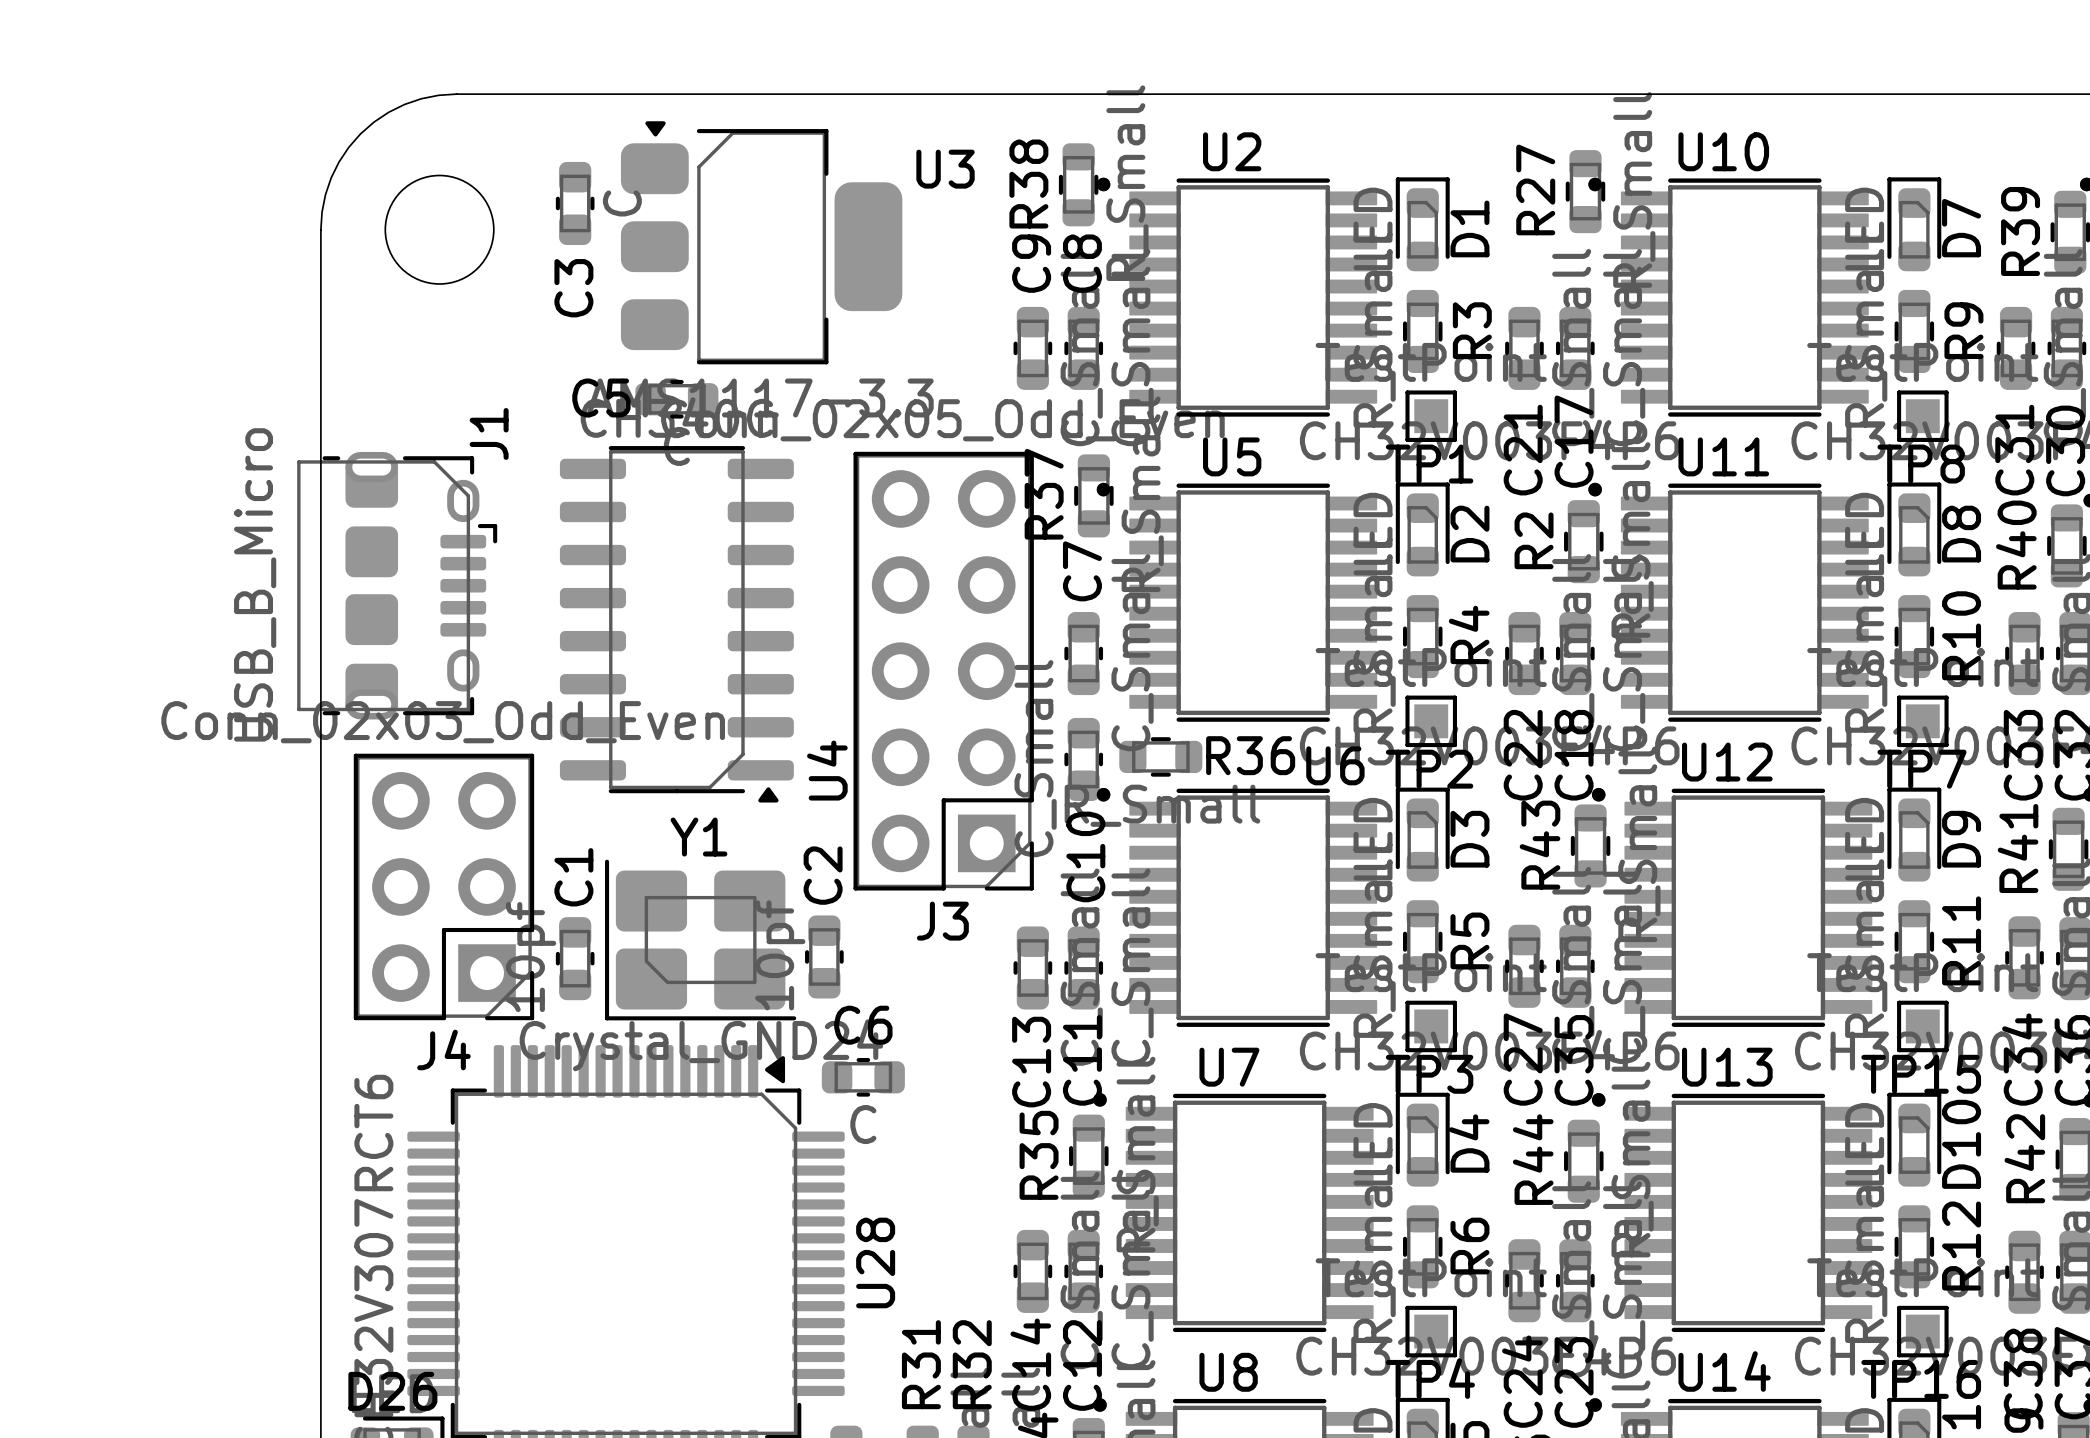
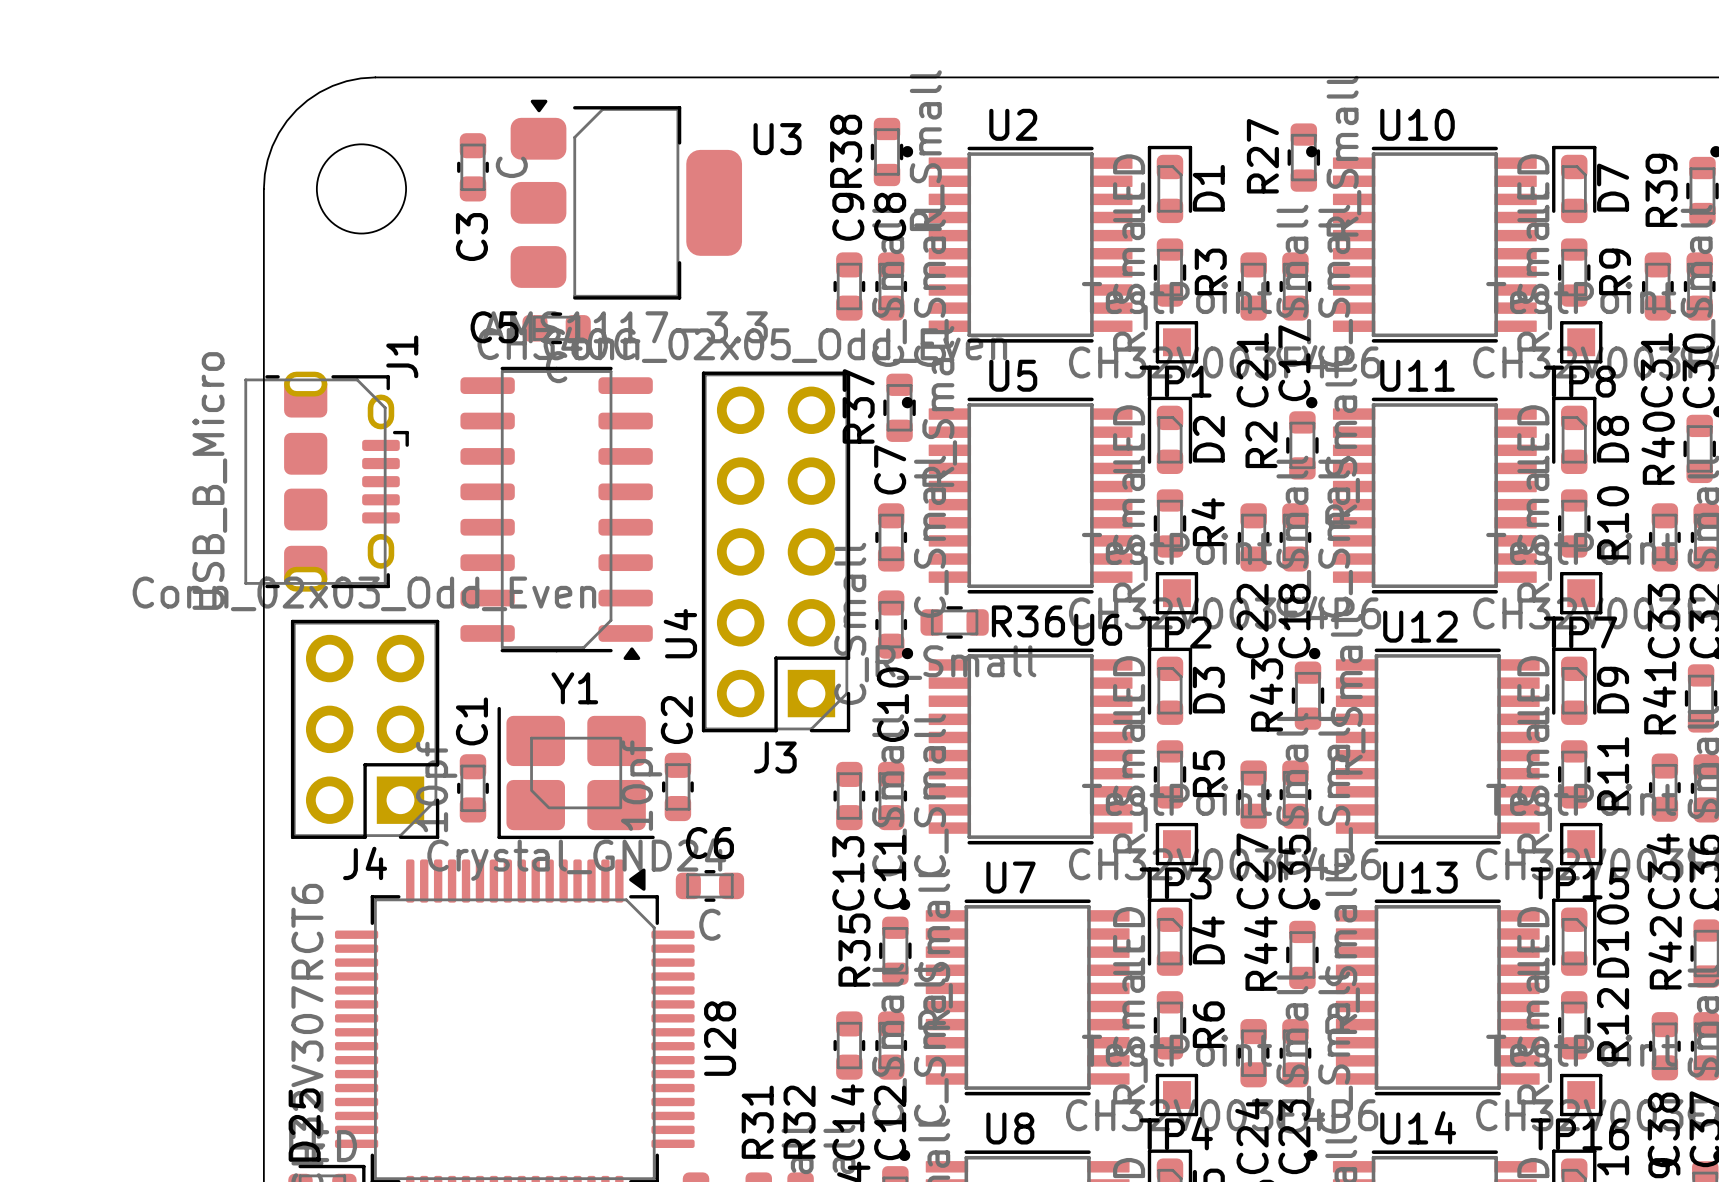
D26 name: D26 (392, 1391) -> D25 (304, 1125)

